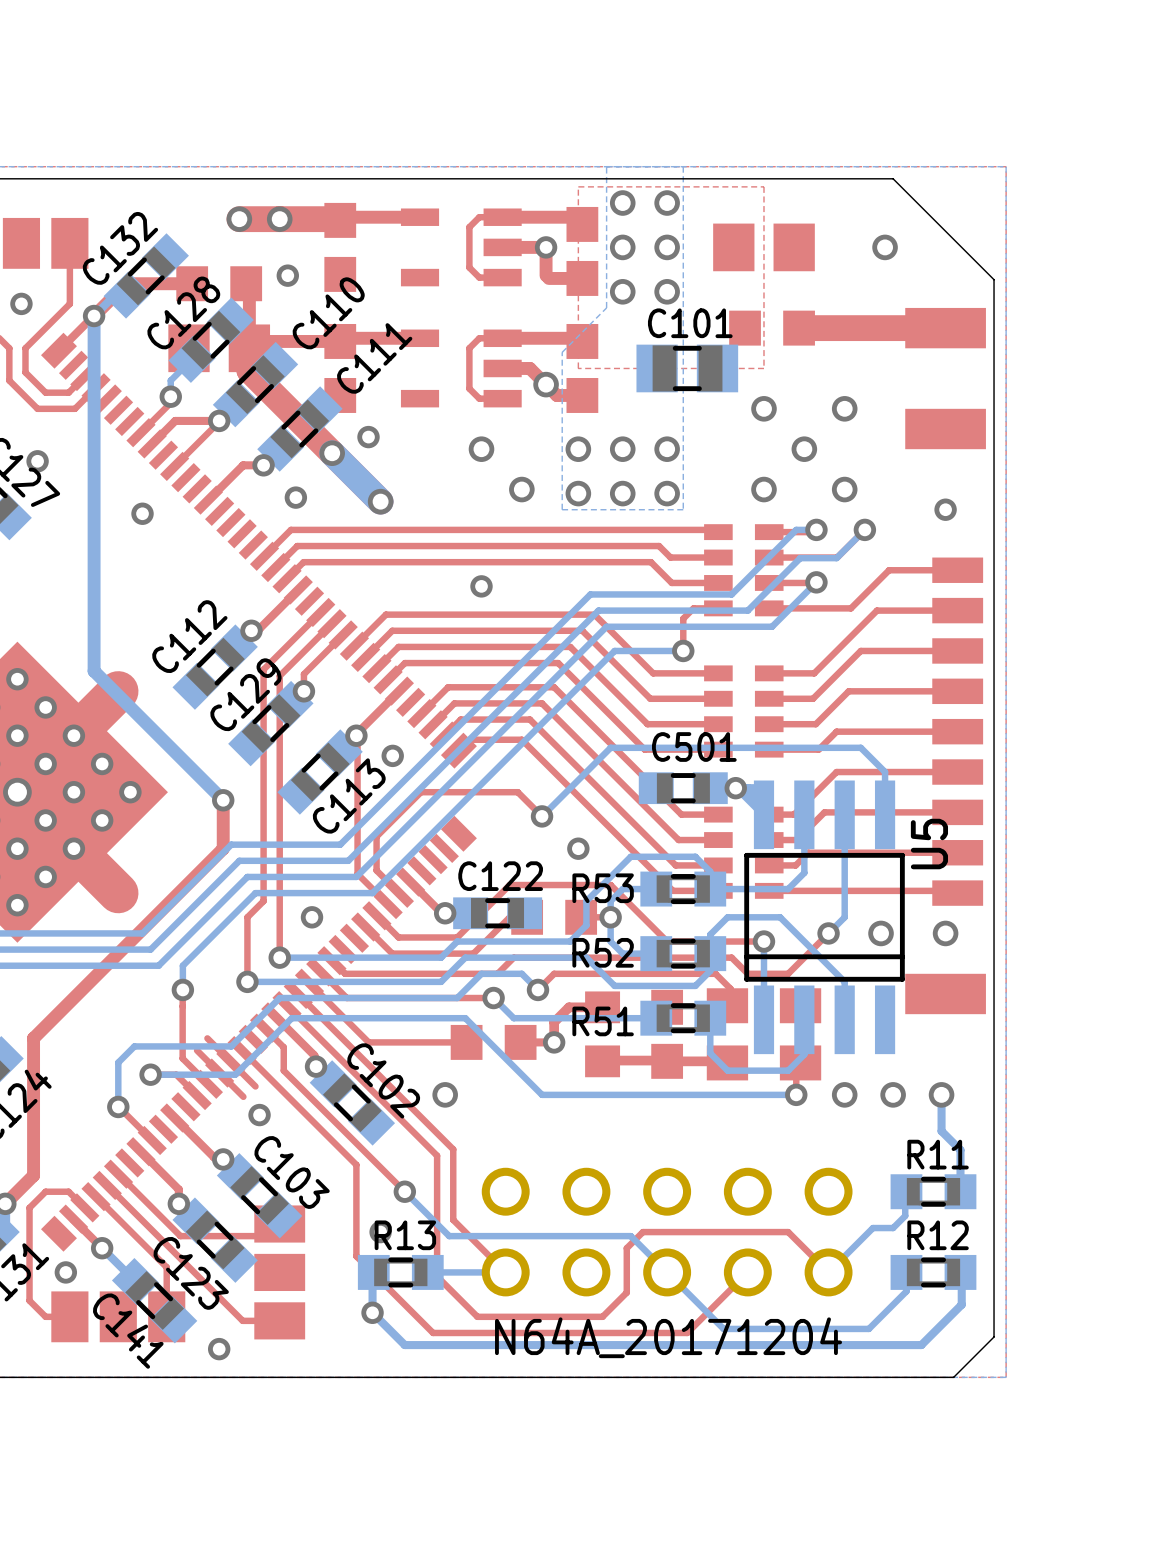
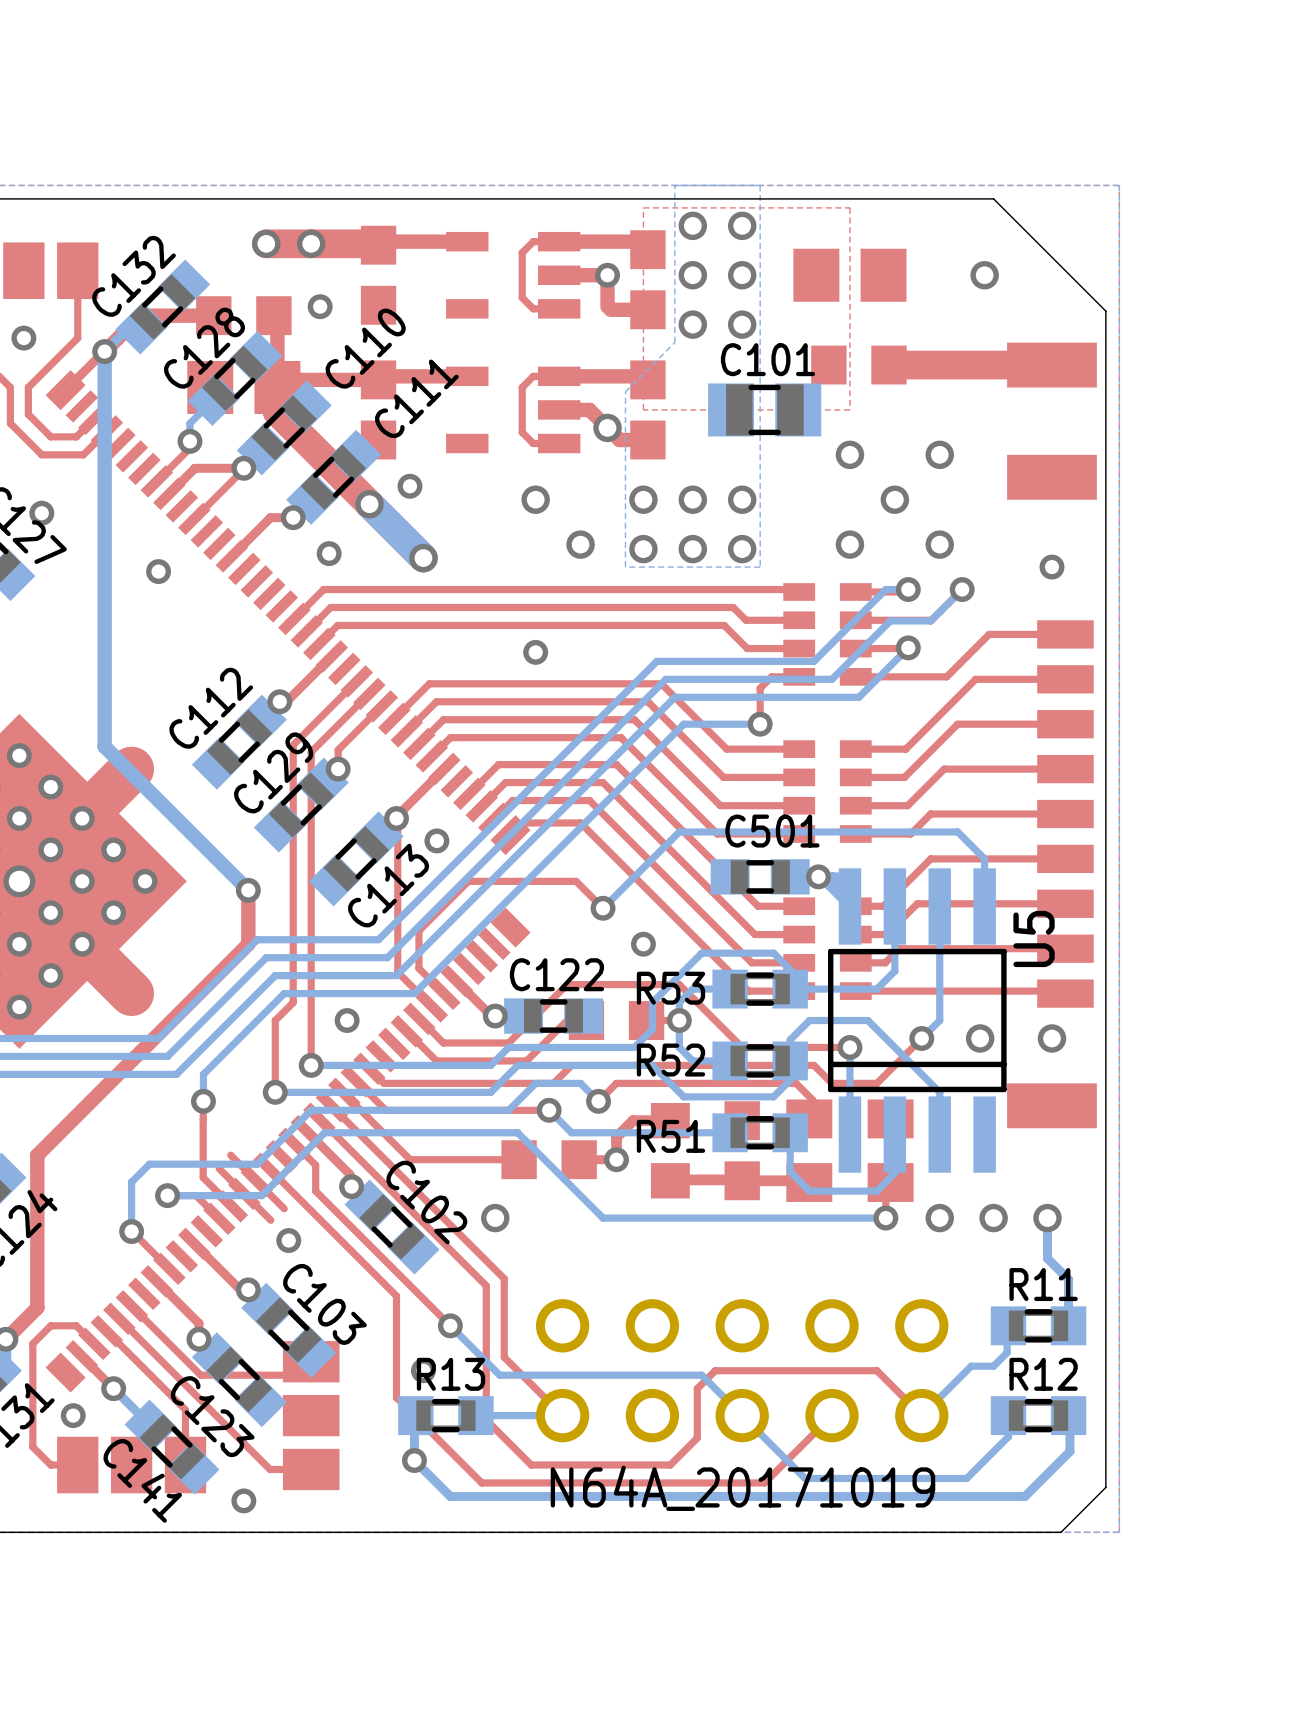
text: N64A_20171204 (668, 1337) -> N64A_20171019 (742, 1488)

